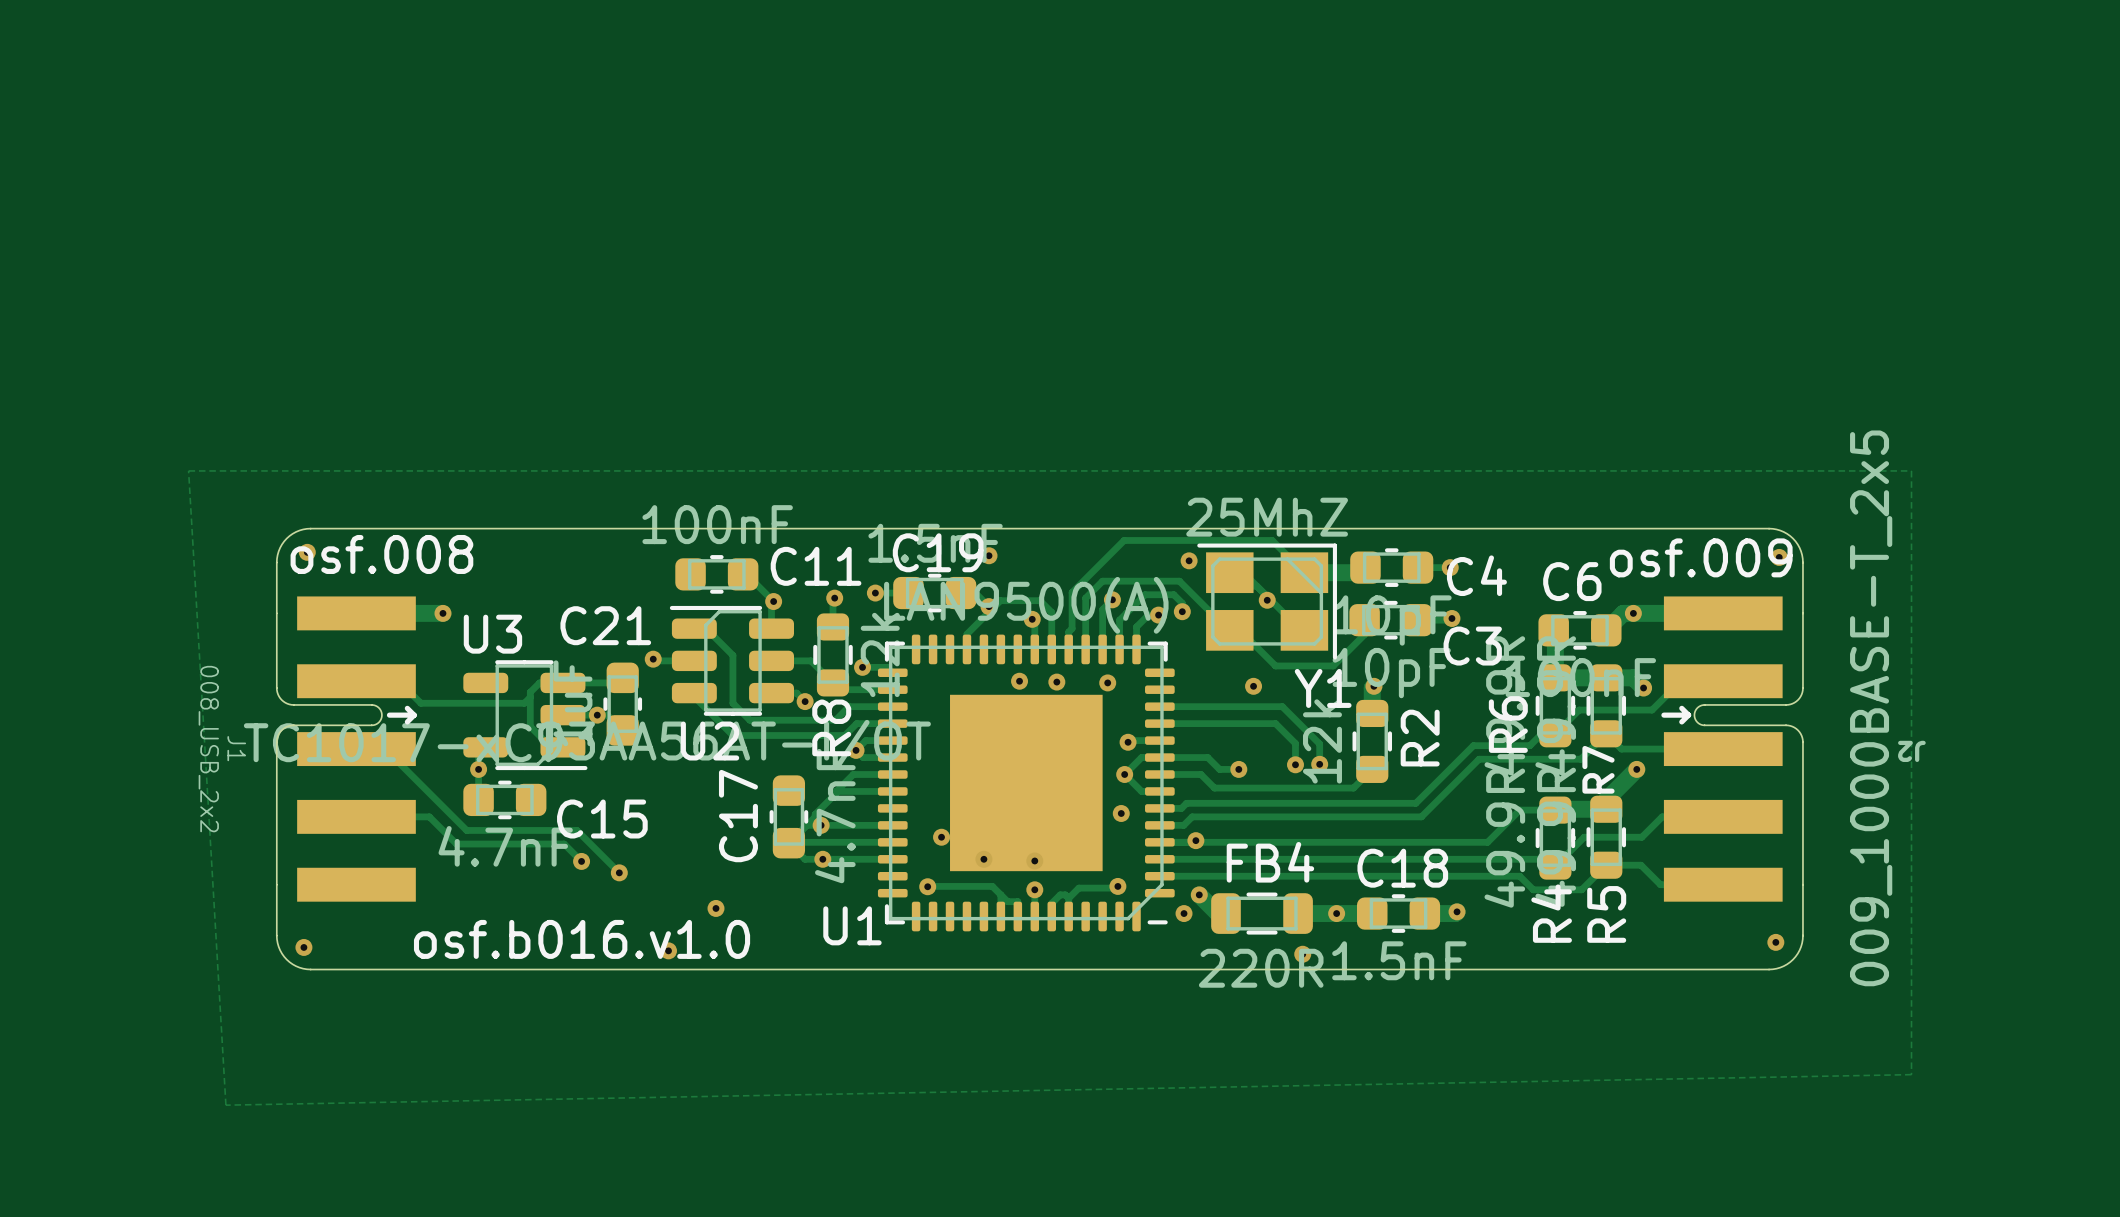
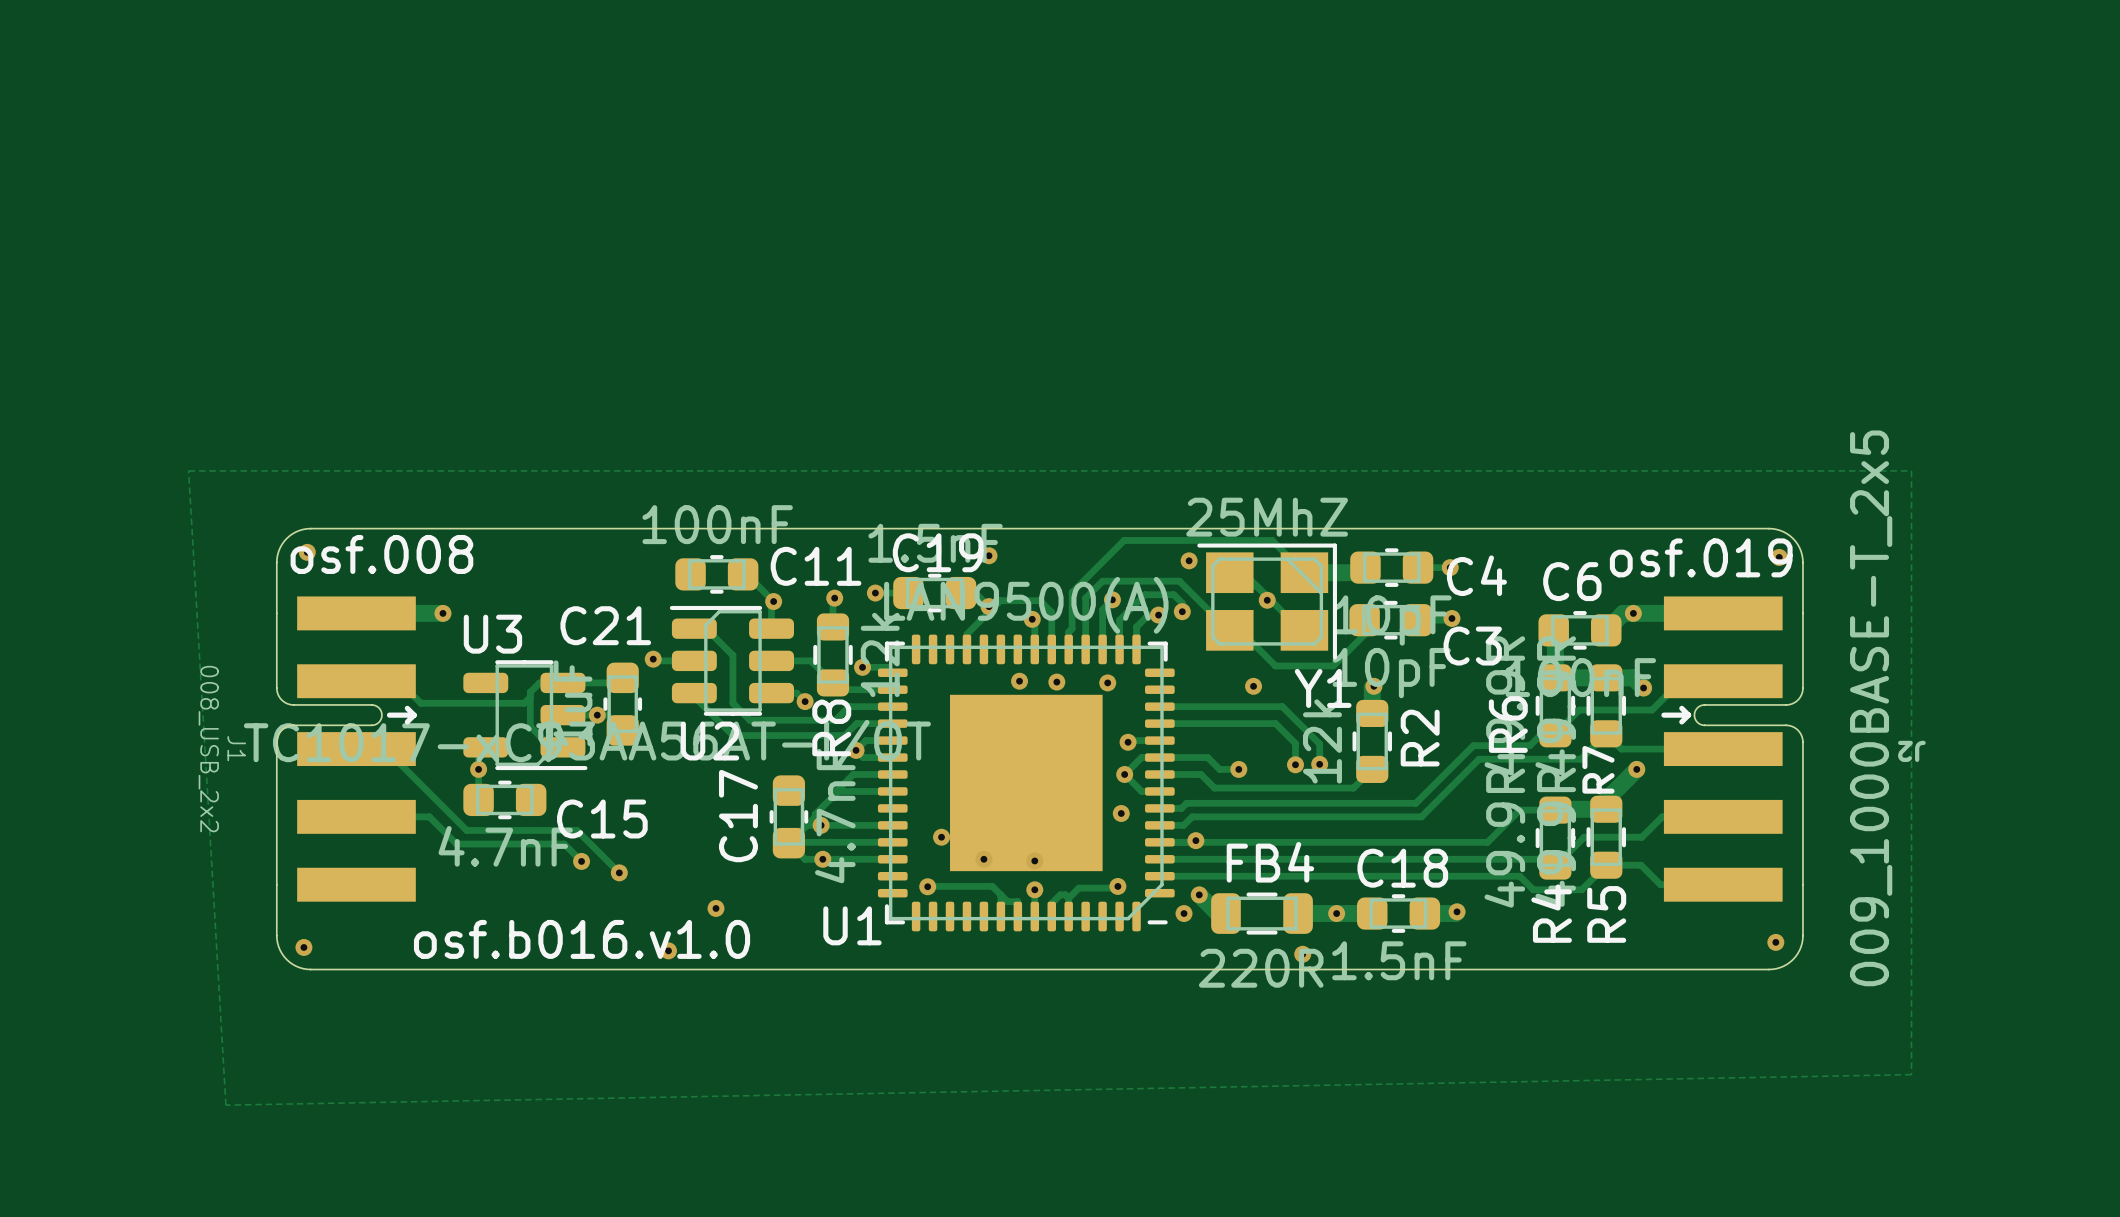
text: osf.009 (1701, 557) -> osf.019 (1701, 557)

